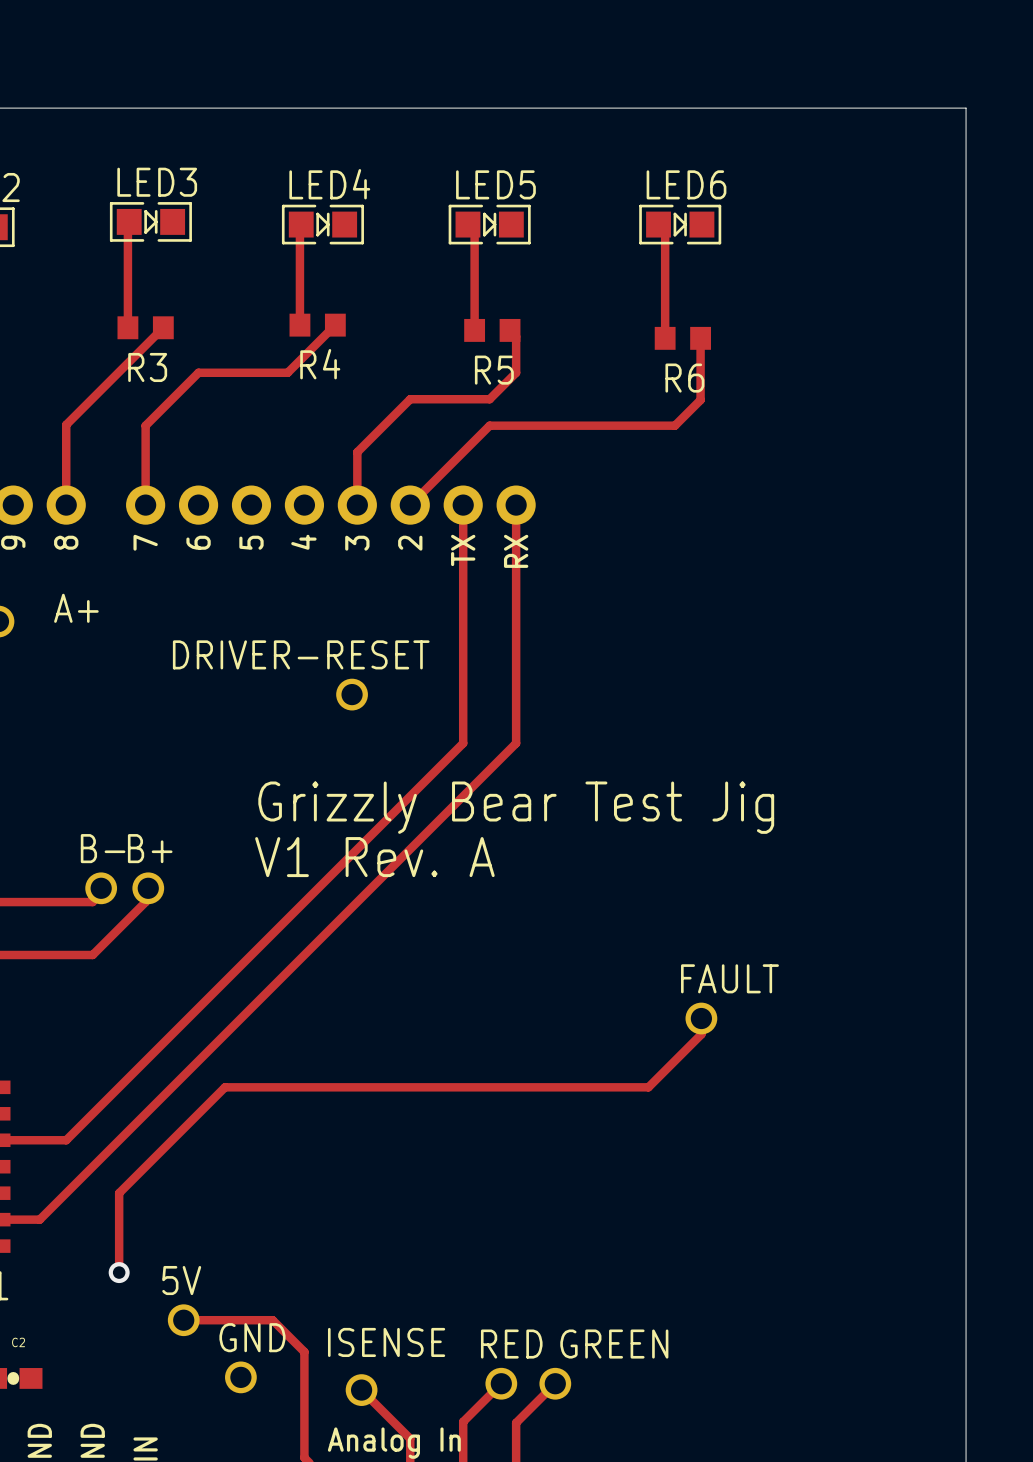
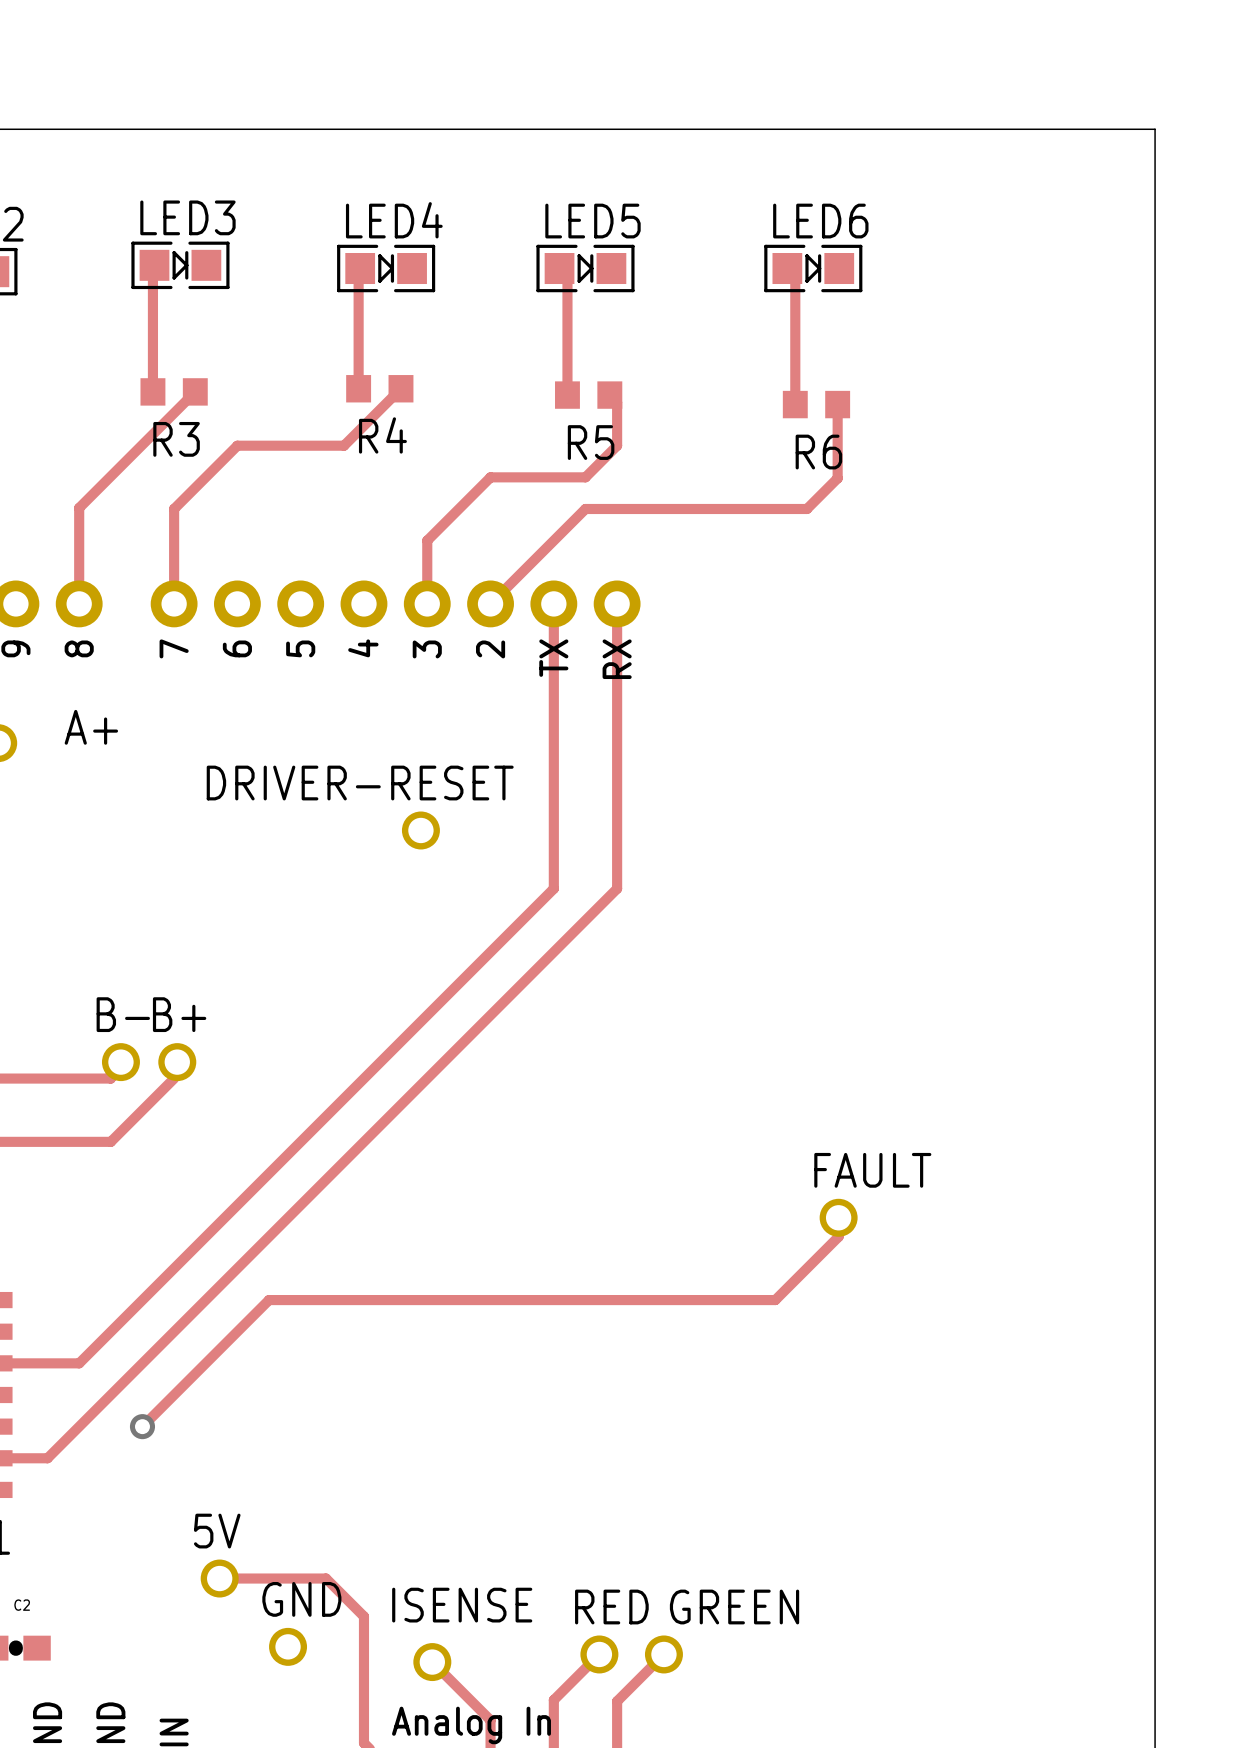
text: Grizzly Bear Test Jig (516, 807) -> none
text: V1 Rev. A (374, 857) -> none
track: (119, 1193) (119, 1272) -> none
via position: (119, 1272) -> (142, 1426)

